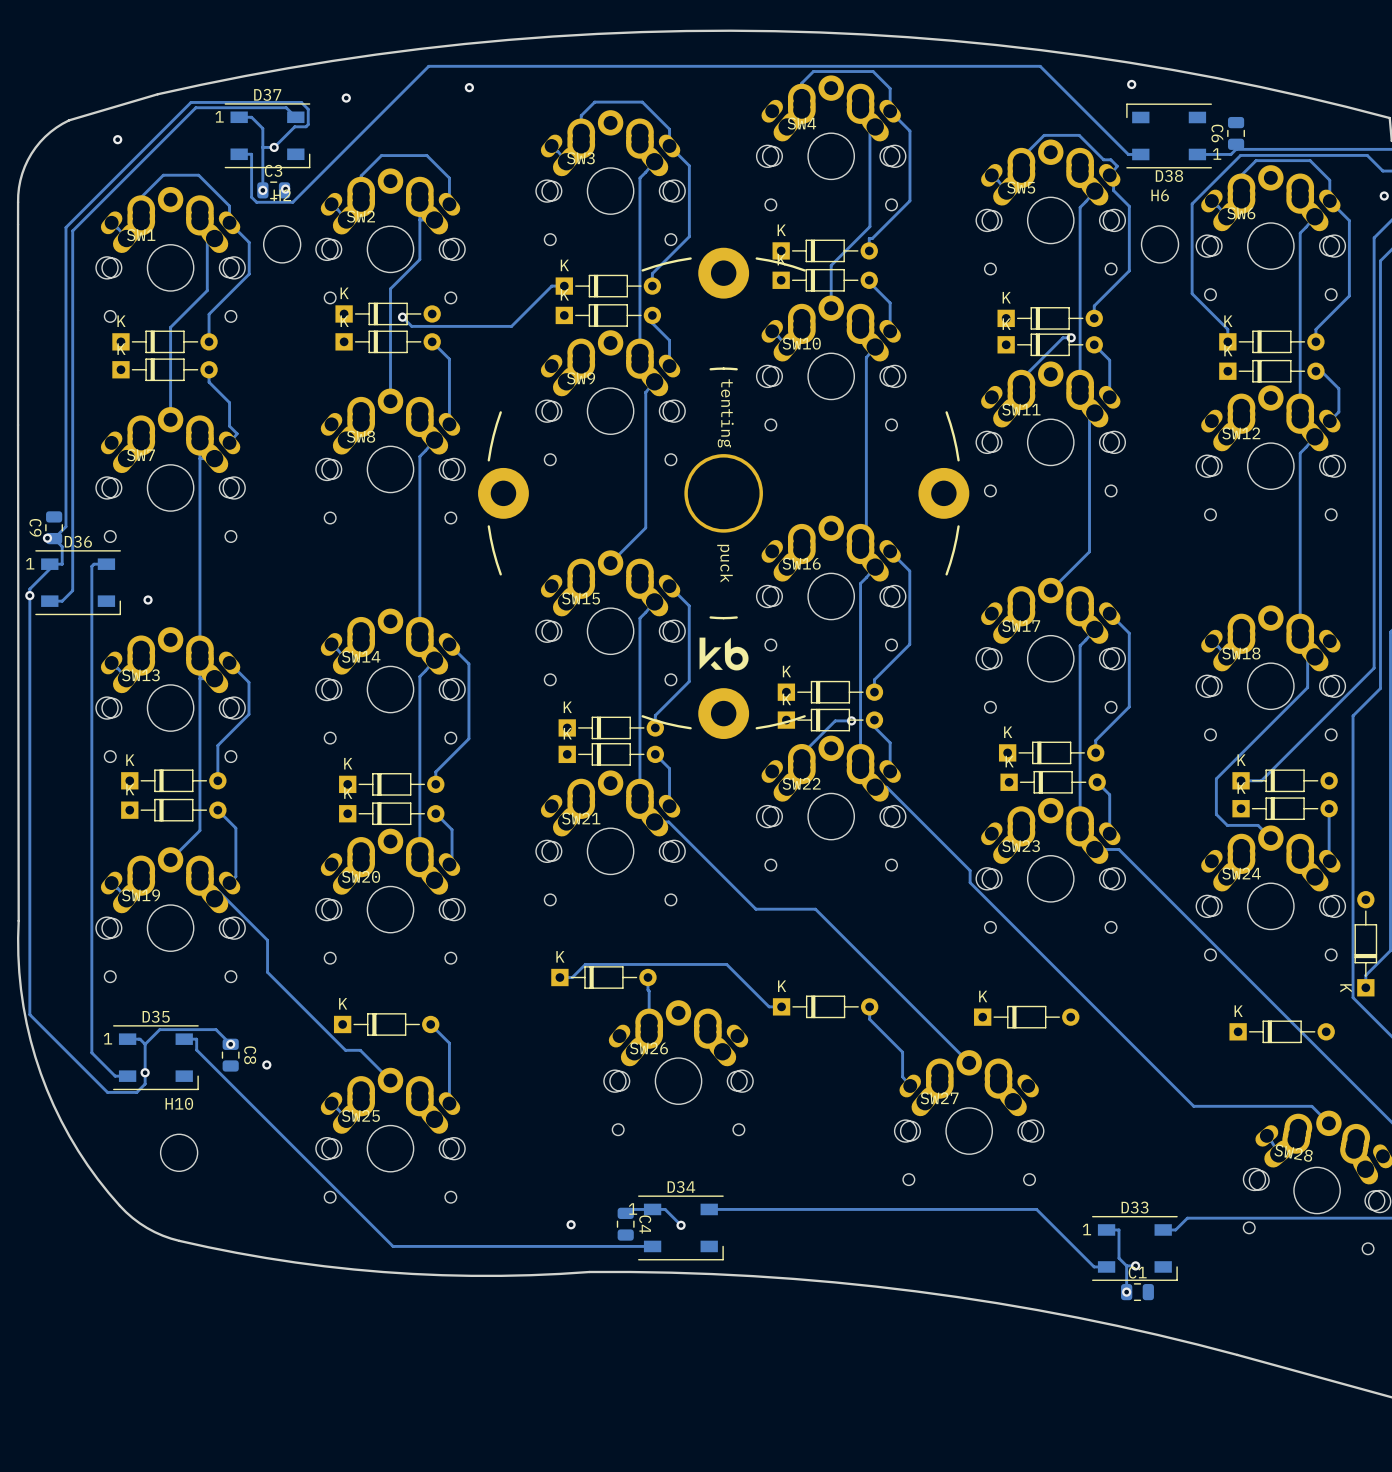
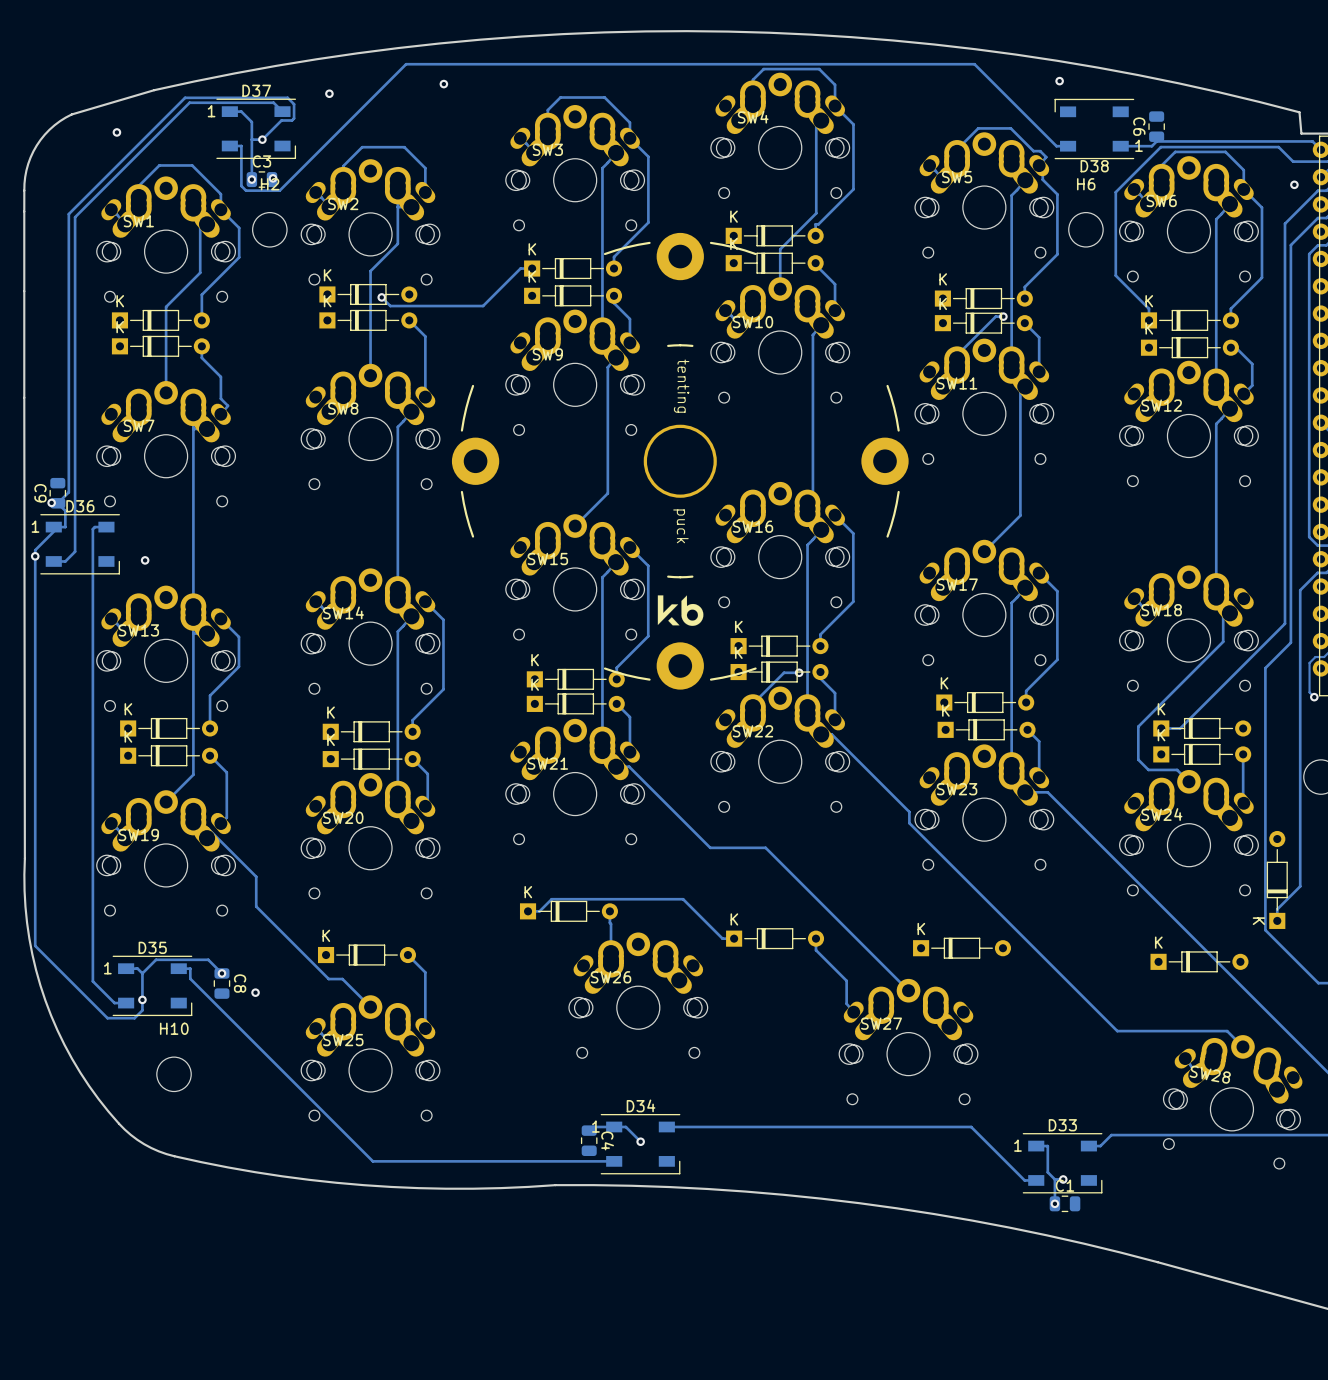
via: (571, 1224) -> none

